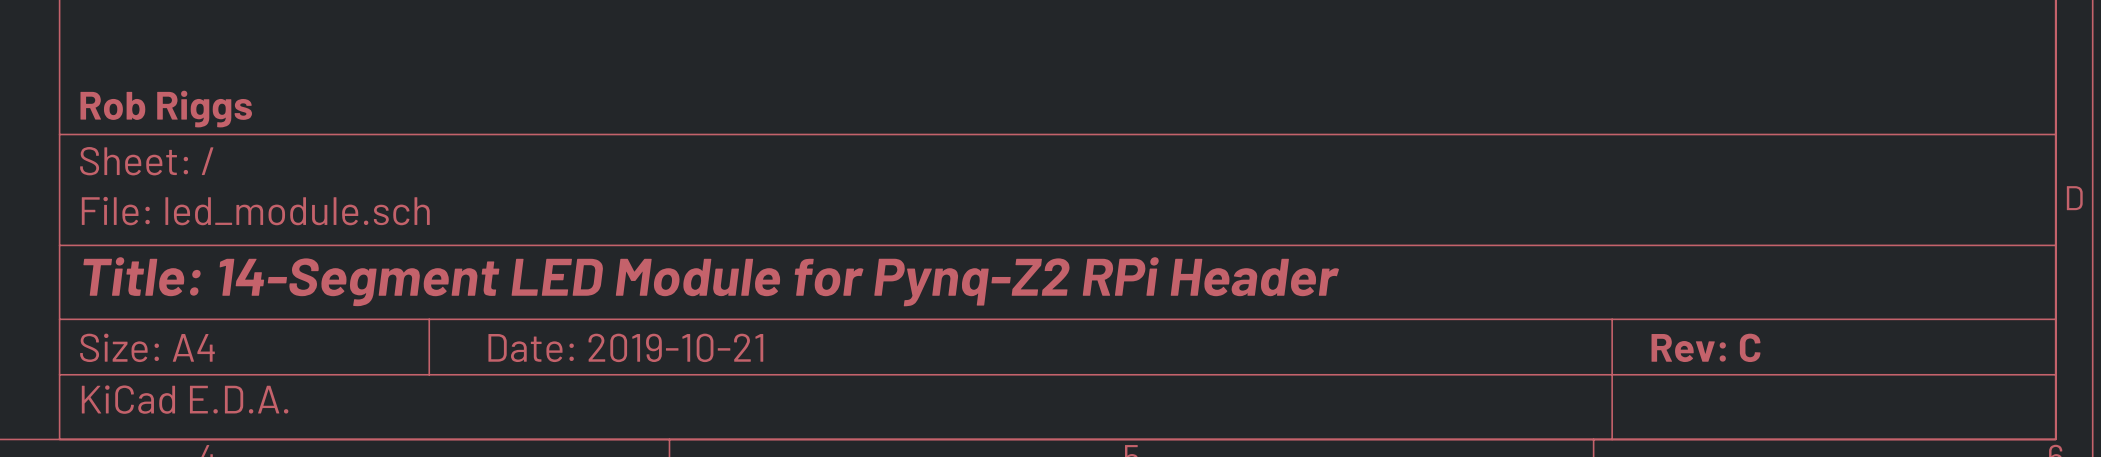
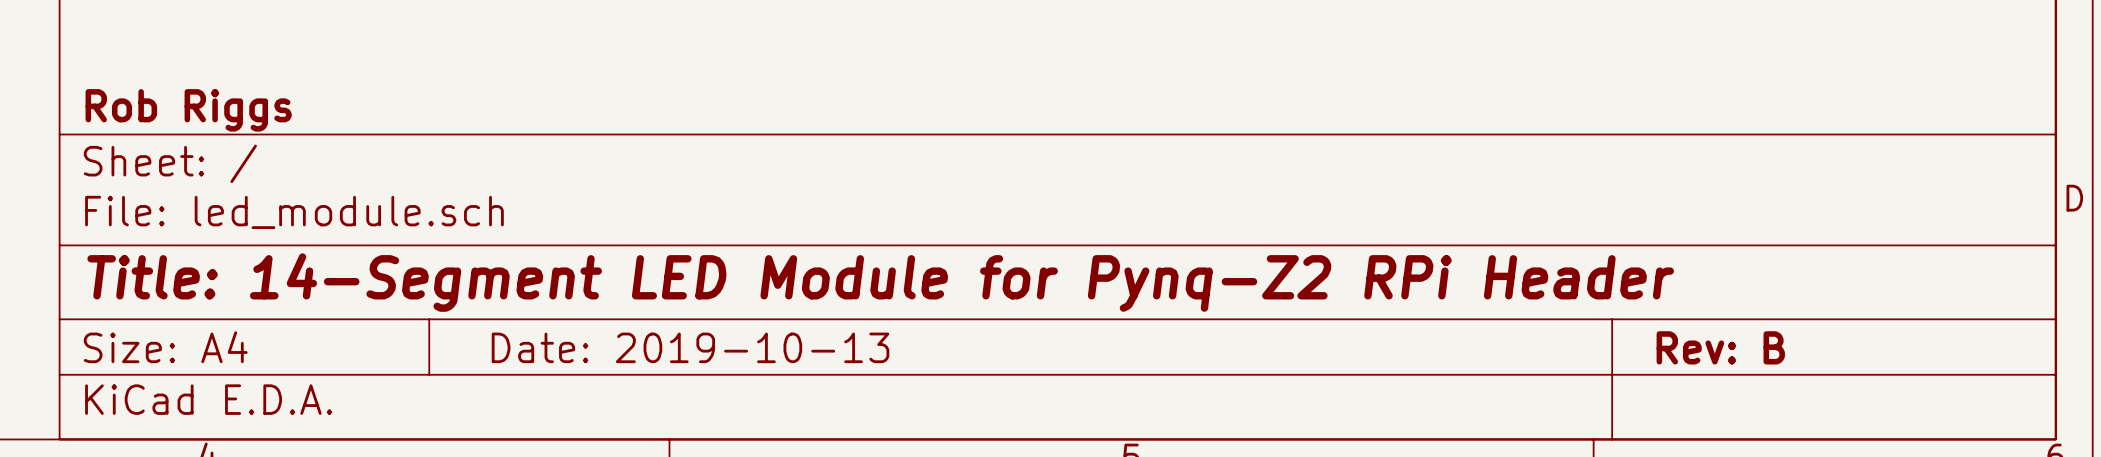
title block: Date: 2019-10-21 (625, 347) -> Date: 2019-10-13 (690, 347)
title block: Rev: C (1705, 347) -> Rev: B (1720, 347)

